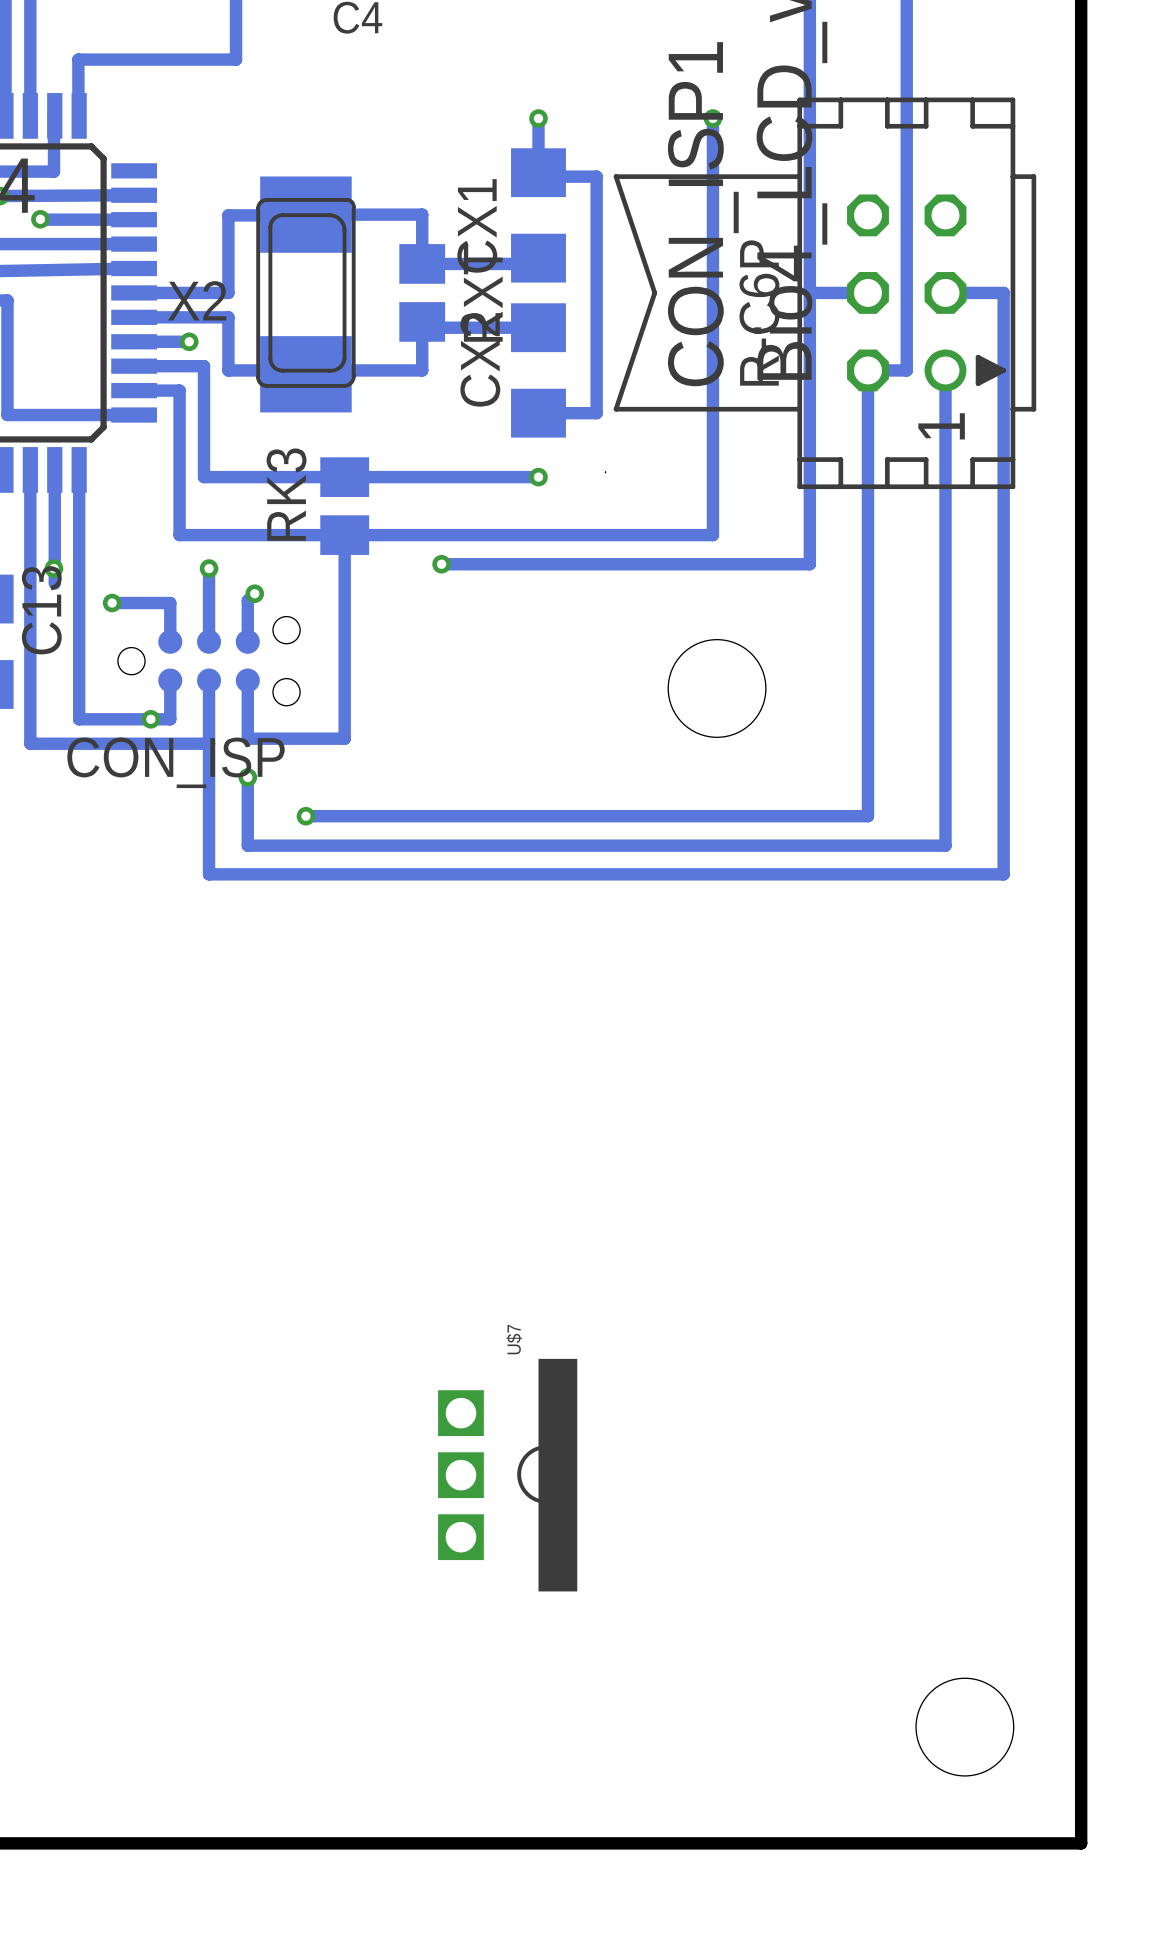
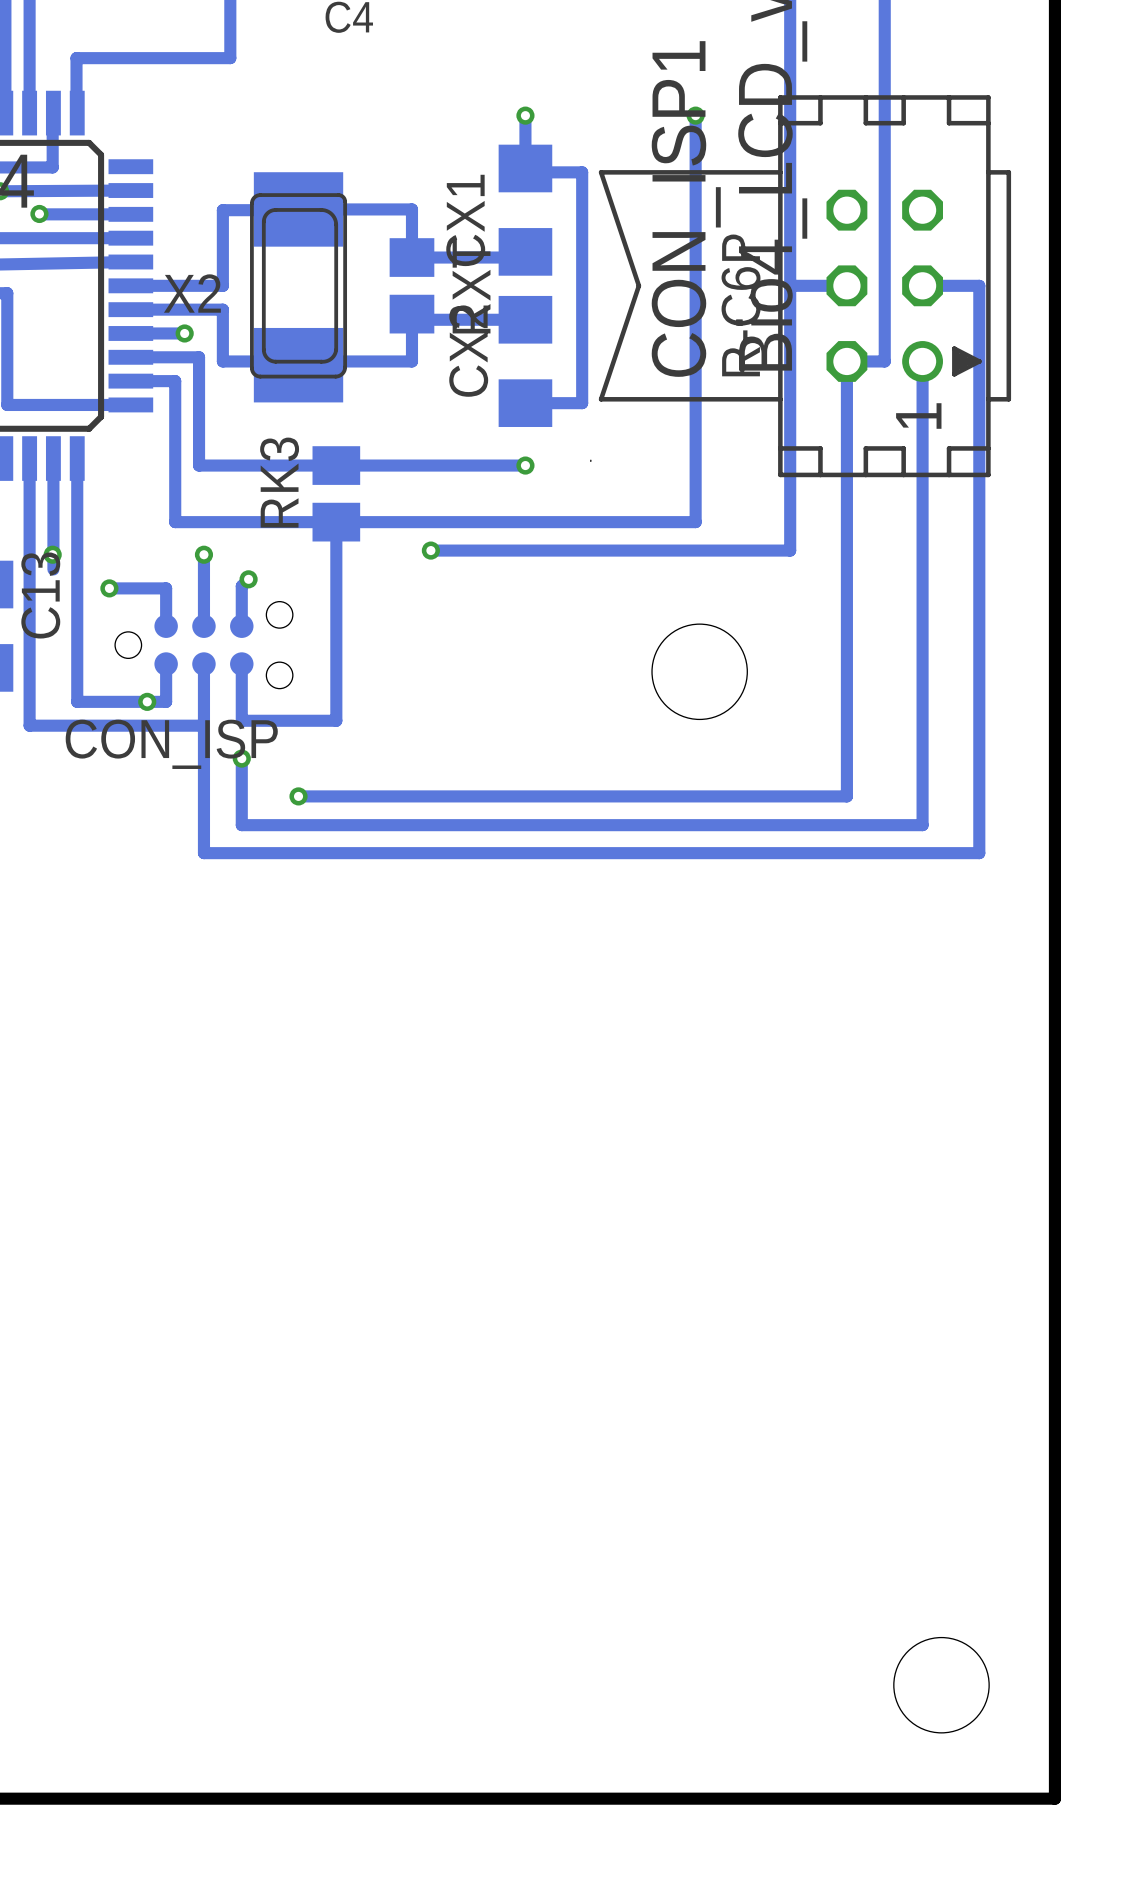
U$7: (507, 1475) -> none

